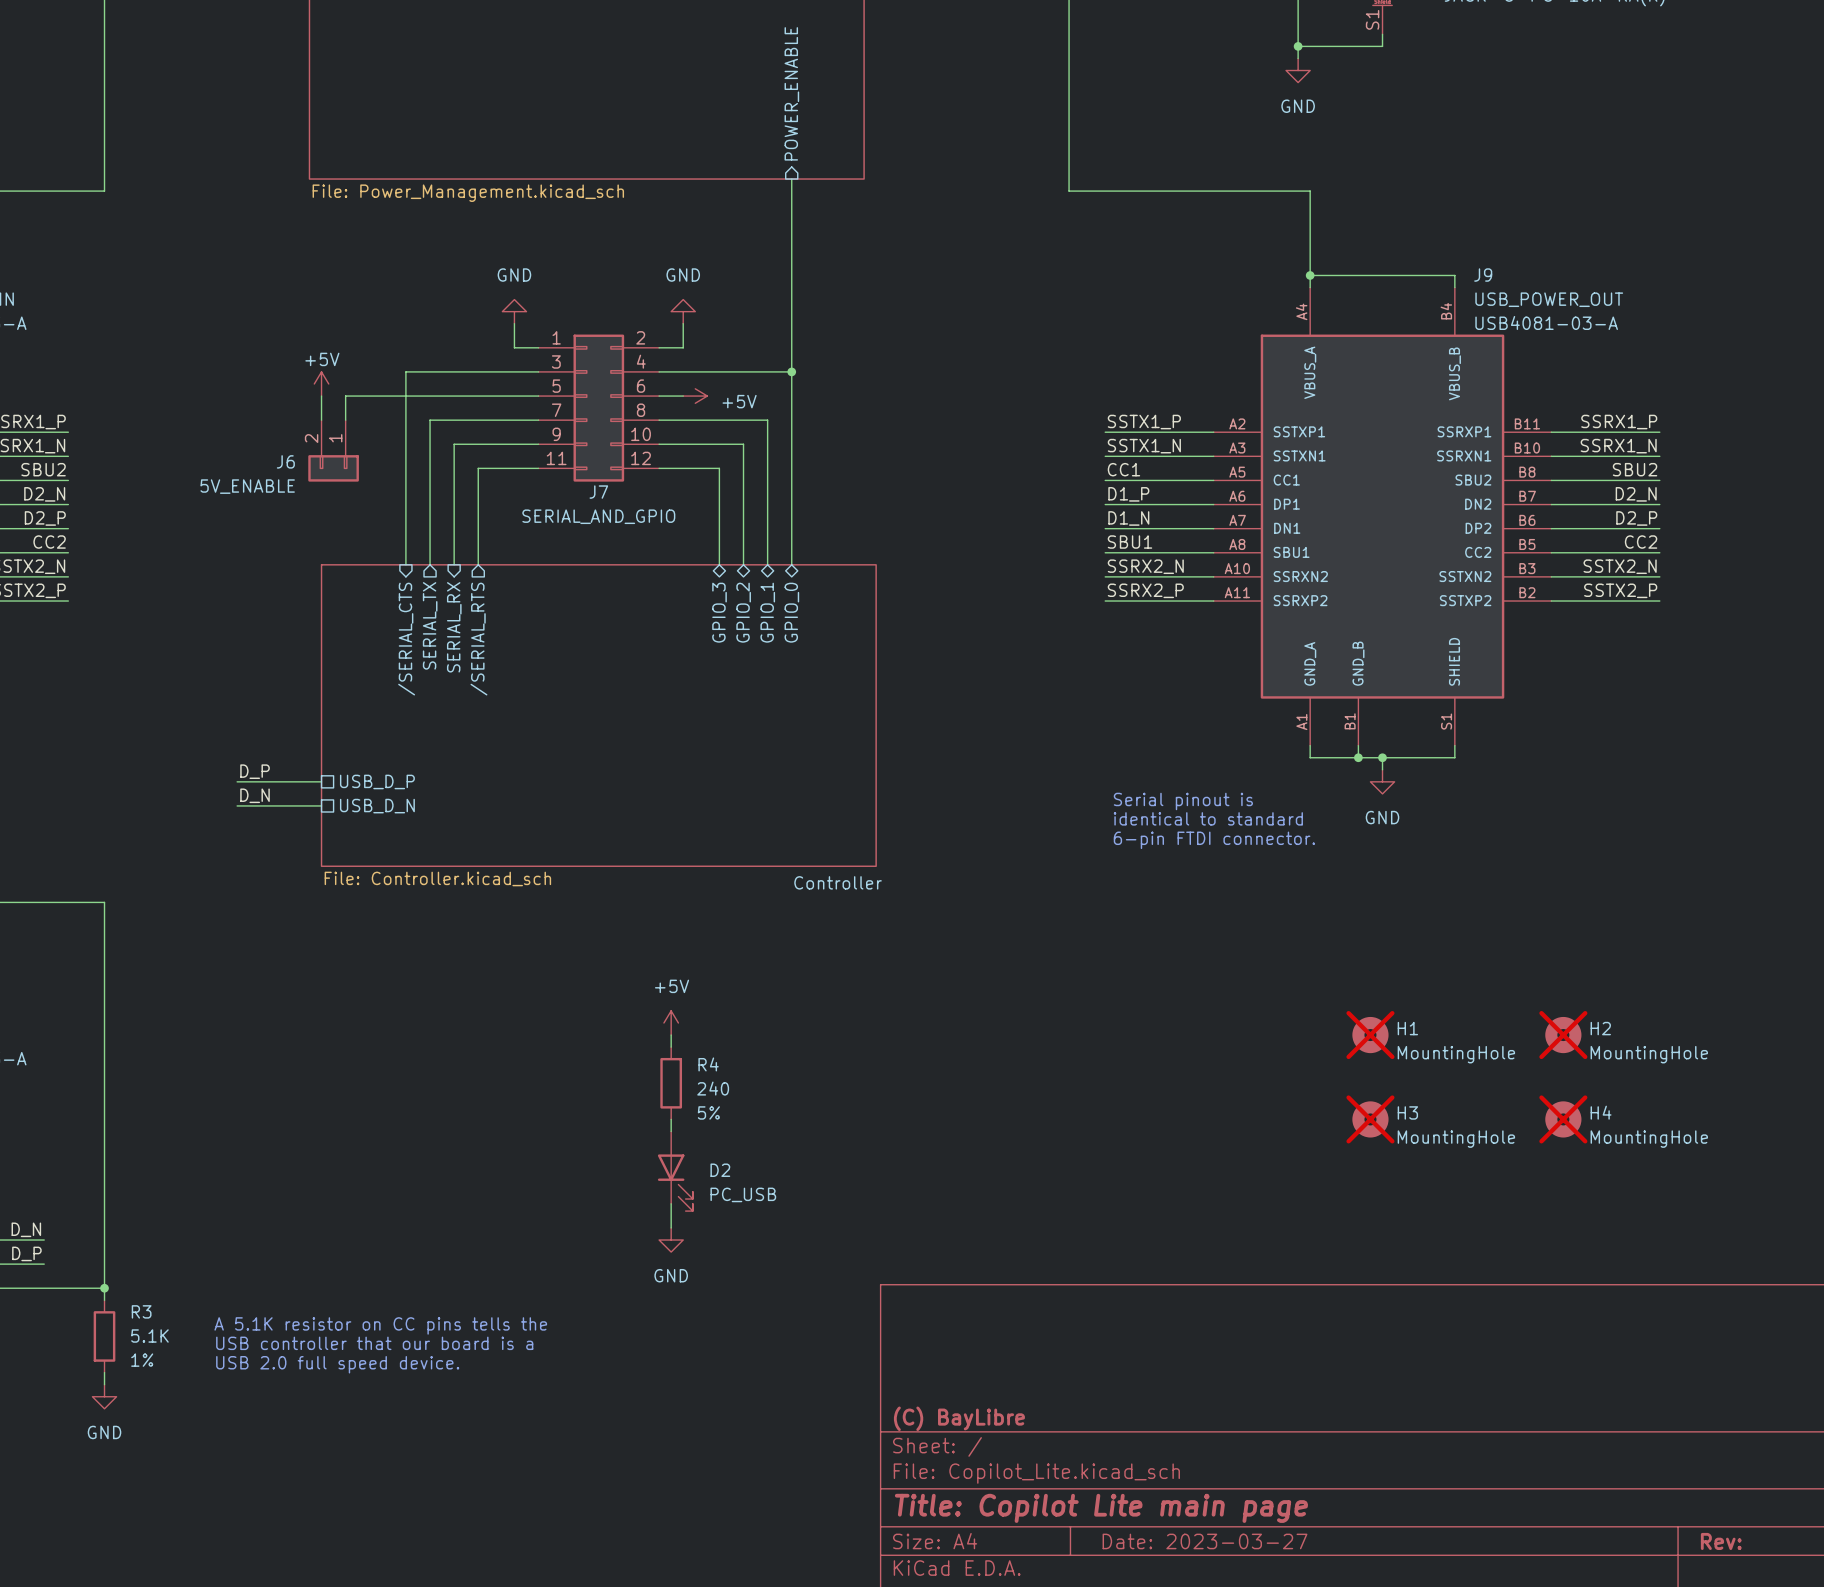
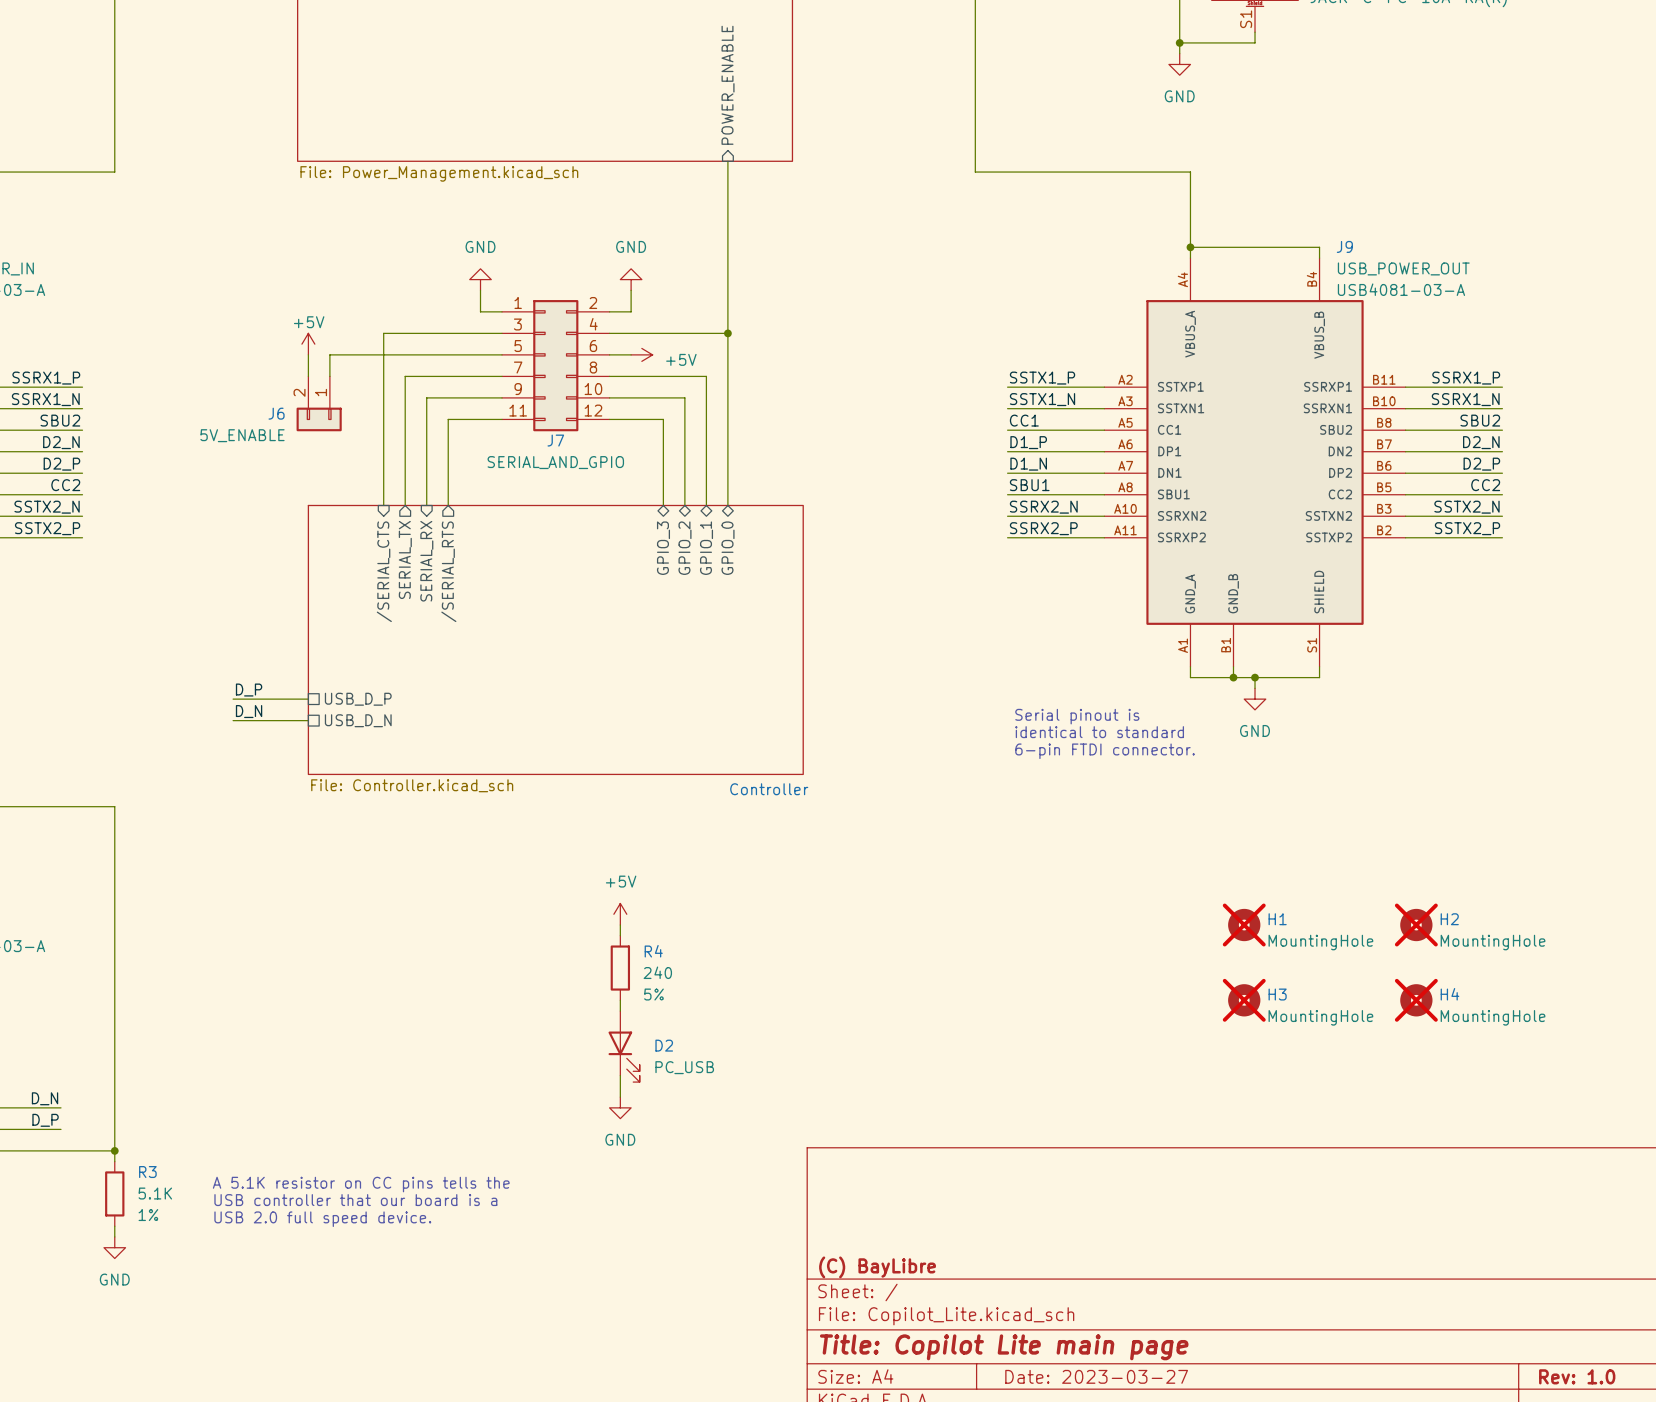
title block: Rev: (1721, 1541) -> Rev: 1.0 (1577, 1376)

